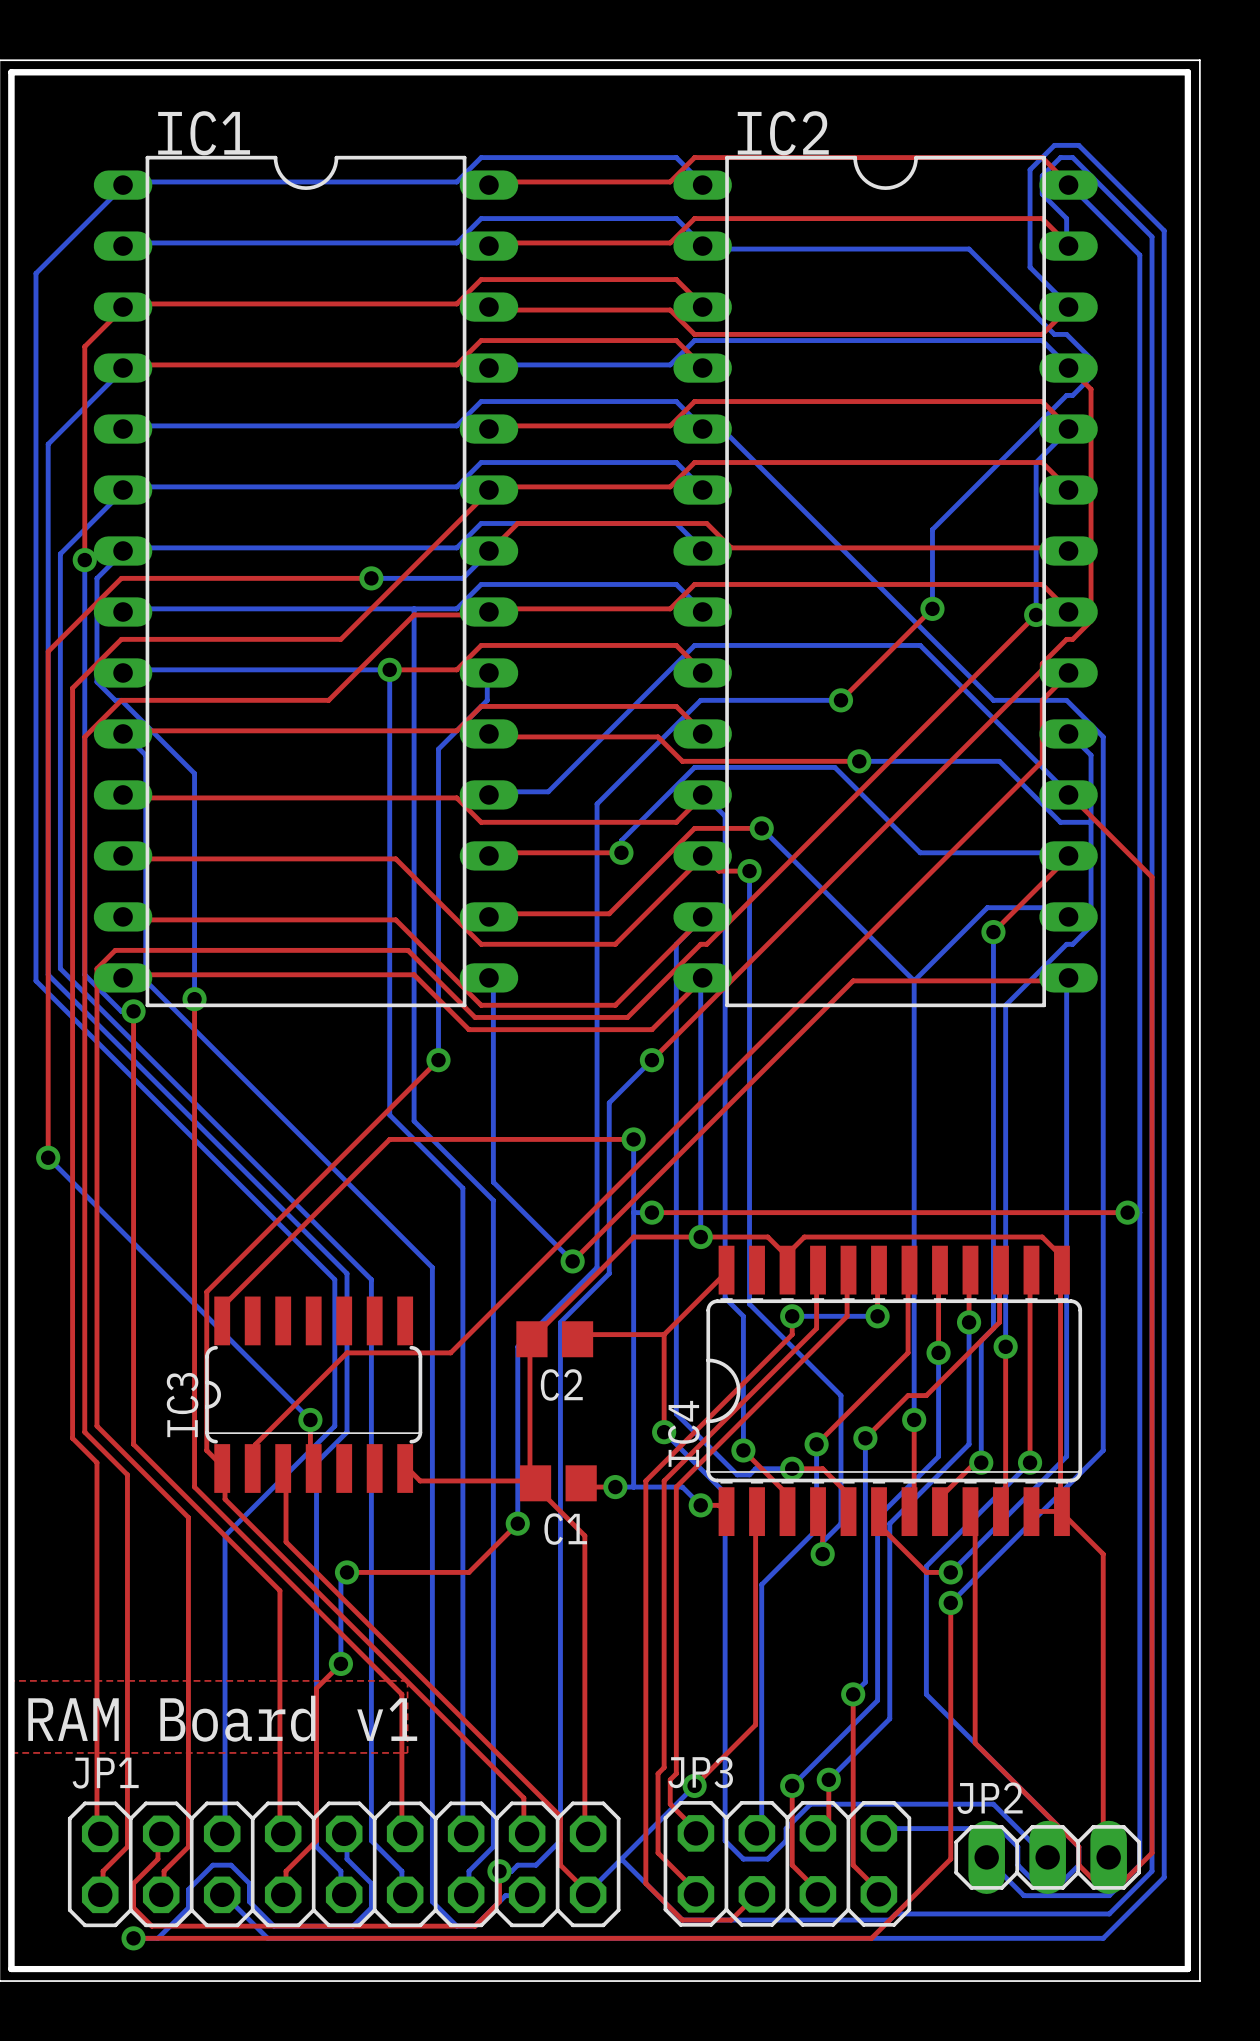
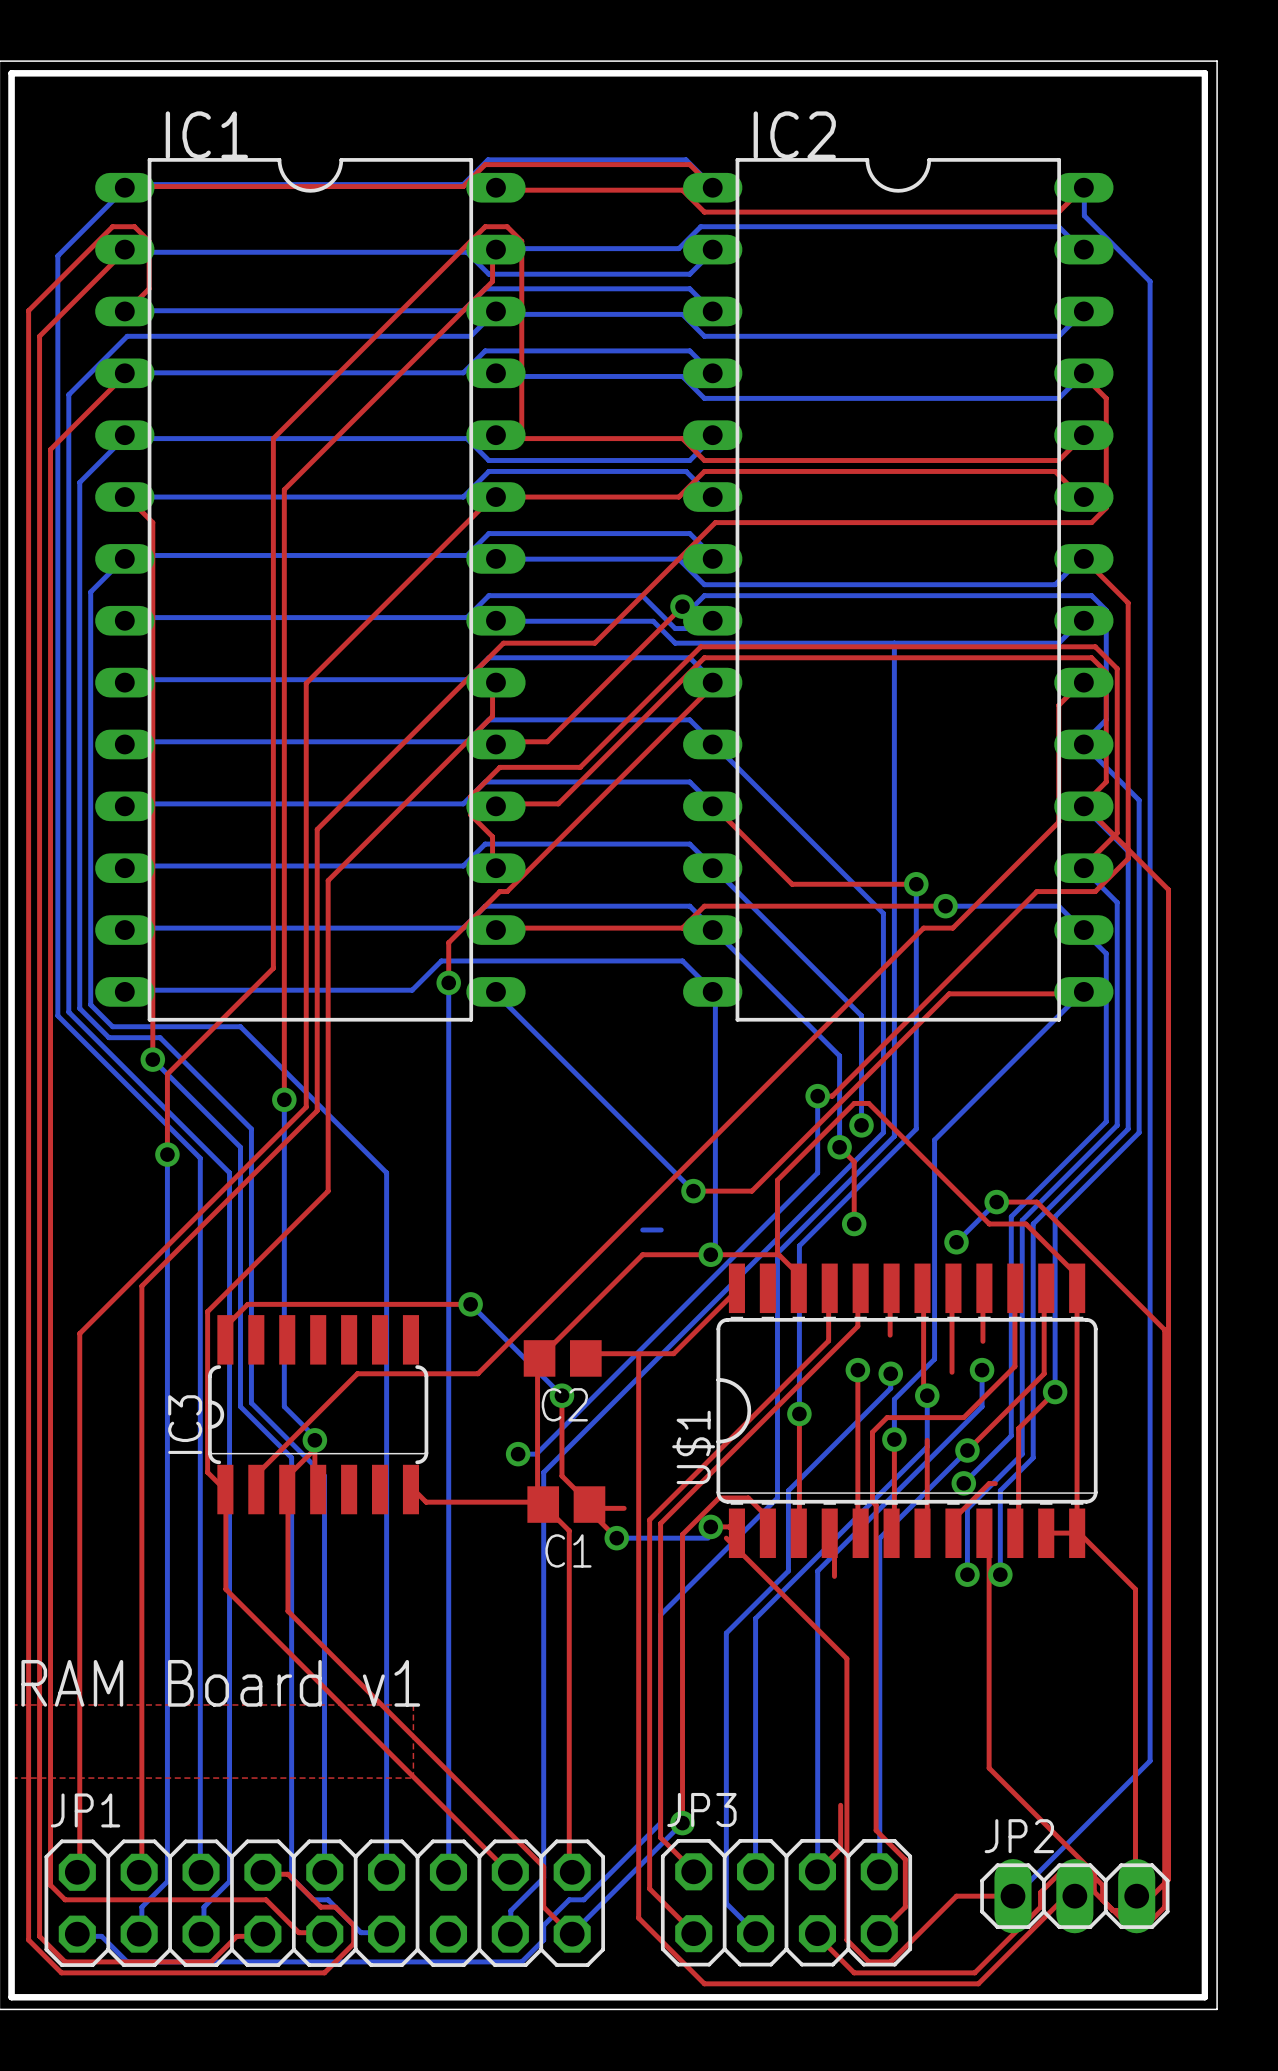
top track: none -> (124, 187) (463, 186) (485, 164) (689, 164) (712, 187)
top track: (488, 185) (493, 181) (670, 181) (694, 157) (1042, 157) (1068, 185) -> (495, 187) (496, 190) (682, 190) (704, 212) (1058, 212) (1083, 187)
bottom track: (1068, 185) (1139, 255) (1139, 1865) (1109, 1895) (1023, 1895) (986, 1857) -> (1083, 187) (1084, 215) (1150, 281) (1150, 1761) (1012, 1896)
top track: none -> (124, 249) (39, 336) (39, 1936) (65, 1961) (211, 1961) (236, 1936) (262, 1936) (262, 1934)
bottom track: (123, 246) (127, 242) (456, 242) (481, 218) (676, 218) (706, 249) (969, 249) (1054, 334) (1066, 334) (1091, 358) (1091, 377) (1072, 395) (1066, 395) (932, 529) (932, 608) -> (124, 249) (127, 252) (466, 252) (488, 274) (689, 274) (712, 249)
top track: (488, 246) (493, 242) (670, 242) (694, 218) (1042, 218) (1068, 246) -> (495, 249) (492, 252) (492, 281) (284, 489) (284, 1099)
bottom track: (1068, 246) (1066, 242) (1066, 218) (1042, 194) (1042, 175) (1060, 157) (1072, 157) (1152, 236) (1152, 1871) (1109, 1913) (895, 1913) (889, 1920) (682, 1920) (621, 1859) -> (1083, 249) (1058, 226) (700, 226) (678, 248) (495, 249)
bottom track: (57, 252) (35, 273) (35, 980) (334, 1279) (334, 1426) (225, 1535) (225, 1828) (222, 1833) -> (57, 255) (57, 1015) (200, 1158) (201, 1872)
top track: none -> (124, 311) (149, 288) (149, 241) (134, 226) (112, 226) (28, 310) (28, 1940) (61, 1972) (324, 1972) (353, 1943) (353, 1925) (335, 1907) (320, 1907) (287, 1874) (266, 1874) (262, 1872)
bottom track: none -> (124, 311) (463, 310) (485, 288) (689, 288) (712, 311)
top track: (488, 307) (493, 310) (670, 310) (694, 334) (1042, 334) (1068, 307) -> none
top track: (702, 307) (676, 279) (481, 279) (456, 303) (127, 303) (84, 346) (84, 560) -> none
bottom track: (1068, 307) (1030, 267) (1030, 169) (1054, 145) (1078, 145) (1164, 230) (1164, 1877) (1103, 1938) (267, 1938) (222, 1894) -> (1083, 311) (1058, 336) (704, 336) (682, 314) (496, 314) (495, 311) (470, 336) (127, 336) (68, 394) (68, 1012) (229, 1172) (229, 1881) (203, 1907) (203, 1932) (201, 1934)
top track: (123, 368) (127, 364) (456, 364) (481, 340) (676, 340) (702, 368) -> (124, 373) (50, 449) (50, 1885) (65, 1899) (266, 1899) (298, 1932) (324, 1934)
bottom track: (123, 368) (48, 444) (48, 974) (347, 1273) (347, 1432) (316, 1462) (316, 1846) (340, 1871) (340, 1889) (344, 1894) -> (124, 373) (463, 372) (485, 350) (689, 350) (712, 373)
bottom track: (488, 368) (493, 364) (670, 364) (694, 340) (1042, 340) (1068, 368) -> (495, 373) (496, 376) (682, 376) (704, 398) (1058, 398) (1083, 373)
top track: (1068, 368) (1091, 389) (1091, 621) (1072, 639) (1066, 639) (1042, 663) (1042, 669) (651, 1060) -> (1083, 373) (1084, 376) (1106, 398) (1106, 507) (1091, 522) (715, 522) (594, 643) (503, 643) (317, 829) (317, 1110) (141, 1286) (141, 1870) (139, 1872)
bottom track: (123, 429) (127, 425) (456, 425) (481, 401) (676, 401) (706, 432) (725, 432) (993, 700) (1066, 700) (1103, 736) (1103, 1450) (950, 1602) -> none
top track: (488, 429) (493, 425) (670, 425) (694, 401) (1042, 401) (1068, 429) -> (495, 435) (496, 438) (682, 438) (704, 460) (1058, 460) (1083, 435)
bottom track: none -> (712, 435) (711, 438) (689, 460) (488, 460) (466, 438) (127, 438) (124, 435) (79, 482) (79, 1008) (108, 1037) (160, 1037) (251, 1129) (251, 1403) (324, 1476) (324, 1872)
bottom track: (1068, 429) (1036, 462) (1036, 614) -> none
top track: none -> (521, 438) (521, 241) (507, 226) (485, 226) (273, 438) (273, 968) (167, 1074) (167, 1154)
top track: none -> (124, 497) (127, 497) (152, 522) (152, 1059)
bottom track: (702, 490) (676, 462) (481, 462) (456, 486) (127, 486) (60, 553) (60, 968) (371, 1279) (371, 1840) (401, 1871) (401, 1889) (405, 1894) -> (712, 497) (686, 471) (488, 471) (463, 497) (124, 497)
top track: (1068, 490) (1042, 462) (694, 462) (670, 486) (493, 486) (340, 639) (121, 639) (72, 688) (72, 1438) (96, 1462) (96, 1828) (100, 1833) -> (1083, 497) (1080, 497) (1055, 471) (704, 471) (678, 497) (492, 497) (306, 683) (306, 1107) (79, 1333) (79, 1870) (77, 1872)
top track: (488, 551) (517, 523) (706, 523) (731, 547) (1066, 547) (1068, 551) -> (817, 1096) (832, 1096) (1036, 891) (1095, 891) (1128, 858) (1128, 602) (1083, 558)
bottom track: (488, 551) (462, 578) (371, 578) -> (496, 559) (678, 559) (704, 584) (1055, 584) (1080, 559) (1083, 558)
bottom track: (702, 551) (676, 523) (481, 523) (456, 547) (127, 547) (123, 551) (96, 578) (96, 682) (115, 700) (121, 700) (194, 773) (194, 999) -> (712, 558) (711, 555) (689, 533) (488, 533) (466, 555) (127, 555) (90, 592) (90, 1004) (112, 1026) (240, 1026) (386, 1172) (386, 1872)
bottom track: (84, 560) (84, 974) (121, 1011) (133, 1011) -> none
via: (84, 560) -> none
top track: (371, 578) (121, 578) (48, 651) (48, 1157) -> none
via: (371, 578) -> none
bottom track: none -> (682, 606) (693, 606) (704, 595) (1091, 595) (1106, 610) (1106, 719) (1083, 744) (1139, 800) (1139, 1132) (1055, 1216) (1055, 1392)
via: none -> (682, 606)
bottom track: (414, 608) (414, 1121) (493, 1200) (493, 1846) (468, 1871) (468, 1889) (466, 1894) -> none
bottom track: (456, 608) (481, 584) (676, 584) (702, 611) -> (463, 617) (466, 617) (488, 595) (642, 595) (675, 628) (704, 628) (712, 620)
top track: (932, 608) (840, 700) -> none
via: (932, 608) -> none
bottom track: none -> (495, 620) (653, 621) (675, 643) (1058, 643) (1080, 621) (1083, 620)
top track: (1068, 611) (1042, 584) (694, 584) (670, 608) (493, 608) (487, 614) (414, 614) (328, 700) (121, 700) (84, 736) (84, 1432) (127, 1474) (127, 1846) (103, 1871) (103, 1889) (100, 1894) -> none
top track: (1036, 614) (706, 944) (700, 944) (627, 1017) (475, 1017) (408, 950) (115, 950) (96, 968) (96, 1426) (188, 1517) (188, 1846) (164, 1871) (164, 1889) (161, 1894) -> none
via: (1036, 614) -> none
bottom track: none -> (894, 643) (894, 1136) (777, 1253) (777, 1497) (660, 1614) (660, 1823) (583, 1899) (569, 1899) (543, 1925) (543, 1940) (521, 1961) (127, 1961) (101, 1936) (79, 1936) (77, 1934)
top track: (389, 669) (456, 669) (481, 645) (676, 645) (702, 672) -> (448, 982) (448, 942) (499, 891) (507, 891) (715, 683) (712, 682)
via: (389, 669) -> none
bottom track: (123, 672) (127, 669) (389, 669) (389, 1115) (462, 1188) (462, 1828) (466, 1833) -> (124, 682) (127, 679) (466, 679) (488, 657) (689, 657) (712, 682)
top track: none -> (495, 682) (492, 683) (492, 716) (328, 880) (328, 1191) (207, 1311) (207, 1472) (225, 1490) (225, 1589) (510, 1872)
bottom track: (488, 672) (487, 700) (438, 749) (438, 1060) -> none
top track: (1068, 672) (1042, 700) (1042, 761) (450, 1352) (347, 1352) (255, 1444) (255, 1462) (252, 1468) -> (1083, 682) (1080, 683) (1058, 705) (1058, 822) (952, 928) (923, 928) (477, 1373) (357, 1373) (258, 1472) (258, 1487) (256, 1489)
bottom track: (840, 700) (700, 700) (597, 804) (597, 1267) (517, 1346) (517, 1523) -> none
via: (840, 700) -> none
top track: (123, 733) (127, 730) (456, 730) (481, 706) (676, 706) (702, 733) -> none
bottom track: (123, 733) (145, 755) (145, 980) (432, 1267) (432, 1901) (456, 1926) (475, 1926) (505, 1895) (527, 1894) -> (124, 744) (127, 741) (466, 741) (488, 719) (689, 719) (883, 913) (883, 1132) (543, 1472) (543, 1877) (510, 1910) (510, 1934)
top track: (488, 733) (493, 736) (658, 736) (682, 761) (859, 761) -> (495, 744) (496, 741) (547, 741) (682, 606)
bottom track: (1068, 733) (1091, 755) (1091, 925) (1072, 944) (1066, 944) (1005, 1005) (1005, 1346) -> none
bottom track: (859, 761) (999, 761) (1060, 822) (1091, 822) -> none
via: (859, 761) -> none
top track: (123, 794) (127, 797) (456, 797) (481, 822) (676, 822) (702, 794) -> (916, 884) (792, 884) (712, 806)
top track: none -> (495, 806) (496, 803) (558, 803) (704, 657) (1091, 657) (1106, 672) (1106, 781) (1083, 806)
bottom track: (488, 794) (493, 791) (548, 791) (694, 645) (920, 645) (1068, 794) -> (1000, 1574) (1000, 1490) (1033, 1457) (1033, 1224) (1128, 1129) (1128, 851) (1083, 806)
bottom track: (702, 794) (725, 816) (725, 1298) (743, 1316) (743, 1450) -> (712, 806) (689, 781) (485, 781) (463, 803) (127, 803) (124, 806)
top track: (761, 828) (694, 828) (609, 913) (493, 913) (488, 916) -> (945, 906) (704, 906) (682, 928) (496, 928) (495, 930)
bottom track: (761, 828) (914, 980) -> none
via: (761, 828) -> none
top track: (621, 852) (493, 852) (488, 855) -> (1083, 868) (1117, 833) (1117, 668) (1095, 646) (700, 646) (580, 767) (499, 767) (470, 796) (470, 814) (492, 836) (492, 865) (495, 868)
bottom track: (621, 852) (621, 840) (694, 767) (834, 767) (920, 852) (1066, 852) (1068, 855) -> (967, 1574) (967, 1508) (1022, 1454) (1022, 1220) (1117, 1125) (1117, 902) (1083, 868)
via: (621, 852) -> none
top track: (123, 855) (127, 858) (395, 858) (481, 944) (615, 944) (702, 855) (719, 871) (749, 871) -> none
bottom track: none -> (124, 868) (127, 865) (463, 865) (485, 844) (689, 844) (861, 1015) (861, 1125)
top track: (1068, 855) (993, 932) -> none
bottom track: (749, 871) (749, 1304) (840, 1395) (840, 1523) (822, 1541) (822, 1554) -> none
via: (749, 871) -> none
bottom track: none -> (916, 884) (916, 1129) (799, 1245) (799, 1413)
via: none -> (916, 884)
bottom track: none -> (945, 906) (1058, 906) (1106, 953) (1106, 1121) (1011, 1216) (1011, 1435) (963, 1483)
via: none -> (945, 906)
top track: (123, 916) (127, 919) (395, 919) (481, 1005) (615, 1005) (702, 916) -> none
bottom track: none -> (124, 930) (127, 928) (463, 928) (485, 906) (689, 906) (839, 1055) (839, 1147)
bottom track: (702, 916) (676, 944) (676, 1413) (737, 1474) (749, 1474) (755, 1468) (792, 1468) -> none
bottom track: (1068, 916) (1060, 907) (987, 907) (914, 980) -> none
bottom track: (993, 932) (993, 1328) (981, 1340) (981, 1462) -> none
via: (993, 932) -> none
bottom track: none -> (448, 982) (448, 1872)
via: none -> (448, 982)
top track: (123, 977) (127, 974) (414, 974) (468, 1029) (651, 1029) (702, 977) -> none
bottom track: none -> (124, 991) (127, 990) (412, 990) (441, 960) (682, 960) (715, 993) (715, 1245)
bottom track: (488, 977) (493, 980) (493, 1182) (572, 1261) -> (495, 991) (693, 1191)
bottom track: (702, 977) (700, 980) (700, 1237) -> none
top track: (1068, 977) (1066, 980) (853, 980) (572, 1261) -> (1083, 991) (1080, 993) (949, 993) (751, 1191) (693, 1191)
bottom track: (1068, 977) (1066, 980) (1066, 1456) (950, 1572) -> (1083, 991) (934, 1139) (934, 1359) (894, 1399) (894, 1439)
bottom track: (914, 980) (914, 1375) -> none
top track: (194, 999) (194, 1487) (401, 1694) (401, 1828) (405, 1833) -> none
via: (194, 999) -> none
top track: (133, 1011) (133, 1444) (279, 1590) (279, 1828) (283, 1833) -> none
via: (133, 1011) -> none
bottom track: none -> (152, 1059) (240, 1147) (240, 1406) (291, 1457) (291, 1877) (313, 1899) (328, 1899) (361, 1932) (386, 1934)
via: none -> (152, 1059)
top track: (438, 1060) (206, 1291) (206, 1450) (222, 1468) (225, 1468) (225, 1499) (523, 1798) (523, 1828) (527, 1833) -> none
via: (438, 1060) -> none
bottom track: (651, 1060) (609, 1102) (609, 1273) (560, 1322) (560, 1840) (536, 1865) (517, 1865) (511, 1871) (499, 1871) -> none
via: (651, 1060) -> none
bottom track: none -> (817, 1096) (817, 1172) (536, 1454) (518, 1454)
via: none -> (817, 1096)
bottom track: none -> (284, 1099) (284, 1406) (320, 1443)
via: none -> (284, 1099)
via: none -> (861, 1125)
top track: none -> (839, 1147) (854, 1161) (854, 1224)
via: none -> (839, 1147)
bottom track: none -> (167, 1154) (167, 1881) (141, 1907) (141, 1932) (139, 1934)
via: none -> (167, 1154)
top track: (633, 1139) (389, 1139) (225, 1304) (225, 1316) (222, 1320) -> (470, 1304) (247, 1304) (225, 1326) (225, 1339)
bottom track: (633, 1139) (633, 1487) -> none
via: (633, 1139) -> none
bottom track: (48, 1157) (310, 1419) -> none
via: (48, 1157) -> none
via: none -> (693, 1191)
top track: none -> (996, 1202) (1036, 1202) (1164, 1329) (1164, 1907) (1146, 1925) (1128, 1925) (1102, 1899) (1102, 1885) (1084, 1866) (1066, 1866) (1040, 1892) (1040, 1907) (974, 1972) (854, 1972) (817, 1936) (817, 1933)
bottom track: none -> (996, 1202) (956, 1242)
via: none -> (996, 1202)
via: none -> (854, 1224)
top track: (651, 1212) (1127, 1212) -> none
via: (651, 1212) -> none
via: (1127, 1212) -> none
via: none -> (956, 1242)
top track: none -> (777, 1253) (777, 1180) (854, 1103) (868, 1103) (989, 1224) (1025, 1224) (1077, 1275) (1077, 1533) (1080, 1534) (1135, 1589) (1136, 1896)
top track: (786, 1255) (804, 1237) (1042, 1237) (1060, 1255) (1060, 1511) (1103, 1554) (1103, 1852) (1108, 1857) -> none
via: (572, 1261) -> none
top track: (818, 1270) (816, 1328) (664, 1480) (664, 1767) (658, 1773) (658, 1852) (694, 1889) (695, 1894) -> (829, 1288) (828, 1340) (649, 1519) (649, 1888) (693, 1933)
top track: (848, 1270) (847, 1316) (676, 1487) (676, 1773) (670, 1779) (670, 1804) (694, 1828) (695, 1833) -> (860, 1288) (857, 1289) (857, 1326) (660, 1523) (660, 1837) (693, 1871)
top track: (909, 1270) (908, 1352) (816, 1444) -> (922, 1288) (923, 1392) (927, 1395)
top track: (1000, 1270) (999, 1322) (926, 1395) (908, 1395) (865, 1438) -> (1015, 1288) (1014, 1366) (963, 1417) (887, 1417) (872, 1432) (872, 1501) (876, 1505) (876, 1830) (905, 1859) (905, 1907) (879, 1933)
top track: (1031, 1270) (1030, 1462) -> (1046, 1288) (1044, 1289) (1044, 1373) (967, 1450)
bottom track: none -> (470, 1304) (561, 1395)
via: none -> (470, 1304)
top track: (792, 1316) (792, 1334) (645, 1480) (645, 1883) (682, 1920) (731, 1920) (756, 1894) -> none
bottom track: (792, 1316) (877, 1316) -> none
via: (792, 1316) -> none
via: (877, 1316) -> none
bottom track: (969, 1322) (969, 1444) (889, 1523) (889, 1718) (828, 1779) -> none
via: (969, 1322) -> none
top track: (664, 1334) (664, 1432) -> none
top track: none -> (638, 1355) (638, 1918) (704, 1983) (978, 1983) (1066, 1896) (1074, 1896)
top track: (1005, 1346) (1005, 1511) (1000, 1511) -> (1055, 1392) (1018, 1428) (1018, 1530) (1015, 1533)
via: (1005, 1346) -> none
via: none -> (857, 1370)
bottom track: none -> (982, 1370) (982, 1406) (817, 1571) (817, 1871)
via: none -> (982, 1370)
bottom track: (938, 1352) (938, 1456) (877, 1517) (877, 1700) (792, 1785) -> none
via: (938, 1352) -> none
bottom track: none -> (890, 1373) (890, 1388) (788, 1490) (788, 1571) (726, 1633) (726, 1903) (755, 1933)
via: none -> (890, 1373)
via: none -> (1055, 1392)
top track: none -> (561, 1395) (561, 1476) (591, 1505) (591, 1512) (616, 1538)
via: none -> (561, 1395)
via: none -> (927, 1395)
via: none -> (799, 1413)
via: none -> (894, 1439)
bottom track: none -> (927, 1440) (927, 1446) (755, 1618) (755, 1871)
via: (914, 1419) -> none
top track: none -> (320, 1443) (287, 1476) (287, 1611) (543, 1866) (543, 1907) (572, 1934)
bottom track: none -> (967, 1450) (879, 1538) (879, 1871)
via: none -> (967, 1450)
bottom track: (664, 1432) (725, 1493) (725, 1840) (743, 1859) (767, 1859) (786, 1840) (786, 1828) (810, 1804) (993, 1804) (1047, 1857) -> none
via: (664, 1432) -> none
via: none -> (518, 1454)
IC4 name: IC4 (683, 1433) -> U$1 (693, 1447)
bottom track: (865, 1438) (865, 1682) (853, 1694) -> none
via: (865, 1438) -> none
bottom track: (816, 1444) (816, 1529) (761, 1584) (761, 1828) (756, 1833) -> none
via: (816, 1444) -> none
top track: (743, 1450) (786, 1493) (787, 1511) -> (799, 1413) (798, 1533)
via: (743, 1450) -> none
via: none -> (963, 1483)
via: (981, 1462) -> none
bottom track: (1030, 1462) (926, 1566) (926, 1694) (1078, 1846) (1078, 1865) (1060, 1883) (1036, 1883) (1017, 1865) (1017, 1846) (999, 1828) (883, 1828) (878, 1833) -> none
via: (1030, 1462) -> none
top track: (283, 1468) (286, 1468) (286, 1541) (560, 1816) (560, 1865) (588, 1894) -> none
top track: (792, 1468) (822, 1468) (847, 1493) (848, 1511) -> (857, 1370) (857, 1530) (860, 1533)
via: (792, 1468) -> none
top track: (529, 1480) (535, 1483) (536, 1487) (584, 1535) (584, 1828) (588, 1833) -> none
top track: none -> (540, 1501) (569, 1530) (569, 1870) (572, 1872)
bottom track: (615, 1487) (682, 1487) (700, 1505) -> none
via position: (615, 1487) -> (616, 1538)
top track: (757, 1511) (755, 1724) (694, 1785) -> (767, 1533) (766, 1516) (748, 1497) (719, 1497) (682, 1534) (682, 1823)
top track: (879, 1511) (883, 1517) (883, 1529) (926, 1572) (950, 1572) -> (891, 1533) (894, 1530) (894, 1439)
bottom track: none -> (616, 1538) (708, 1538)
top track: none -> (726, 1538) (846, 1658) (846, 1940) (868, 1961) (890, 1961) (956, 1896) (1012, 1896)
top track: (517, 1523) (468, 1572) (347, 1572) -> none
via: (517, 1523) -> none
via: none -> (1000, 1574)
via: (822, 1554) -> none
bottom track: (347, 1572) (340, 1578) (340, 1663) -> none
via: (347, 1572) -> none
via position: (950, 1572) -> (967, 1574)
top track: (950, 1602) (950, 1859) (871, 1938) (133, 1938) -> none
via: (950, 1602) -> none
top track: (340, 1663) (316, 1688) (316, 1840) (286, 1871) (286, 1889) (283, 1894) -> none
via: (340, 1663) -> none
top track: (853, 1694) (853, 1865) (877, 1889) (878, 1894) -> none
via: (853, 1694) -> none
text position: RAM Board v1 (222, 1718) -> RAM Board v1 (220, 1683)
via: (828, 1779) -> none
bottom track: (694, 1785) (590, 1889) (588, 1894) -> none
via position: (694, 1785) -> (682, 1823)
top track: (792, 1785) (792, 1865) (816, 1889) (817, 1894) -> none
via: (792, 1785) -> none
bottom track: none -> (682, 1823) (572, 1934)
top track: (161, 1833) (157, 1834) (157, 1859) (133, 1883) (133, 1907) (151, 1926) (475, 1926) (499, 1901) (499, 1871) -> none
bottom track: (344, 1833) (347, 1834) (347, 1859) (371, 1883) (371, 1907) (353, 1926) (273, 1926) (249, 1901) (249, 1883) (231, 1865) (212, 1865) (188, 1889) (188, 1907) (157, 1938) (133, 1938) -> none
JP2 position: (1047, 1857) -> (1074, 1896)
JP3 position: (787, 1863) -> (786, 1902)
JP1 position: (344, 1864) -> (324, 1903)
via: (499, 1871) -> none
via: (133, 1938) -> none

